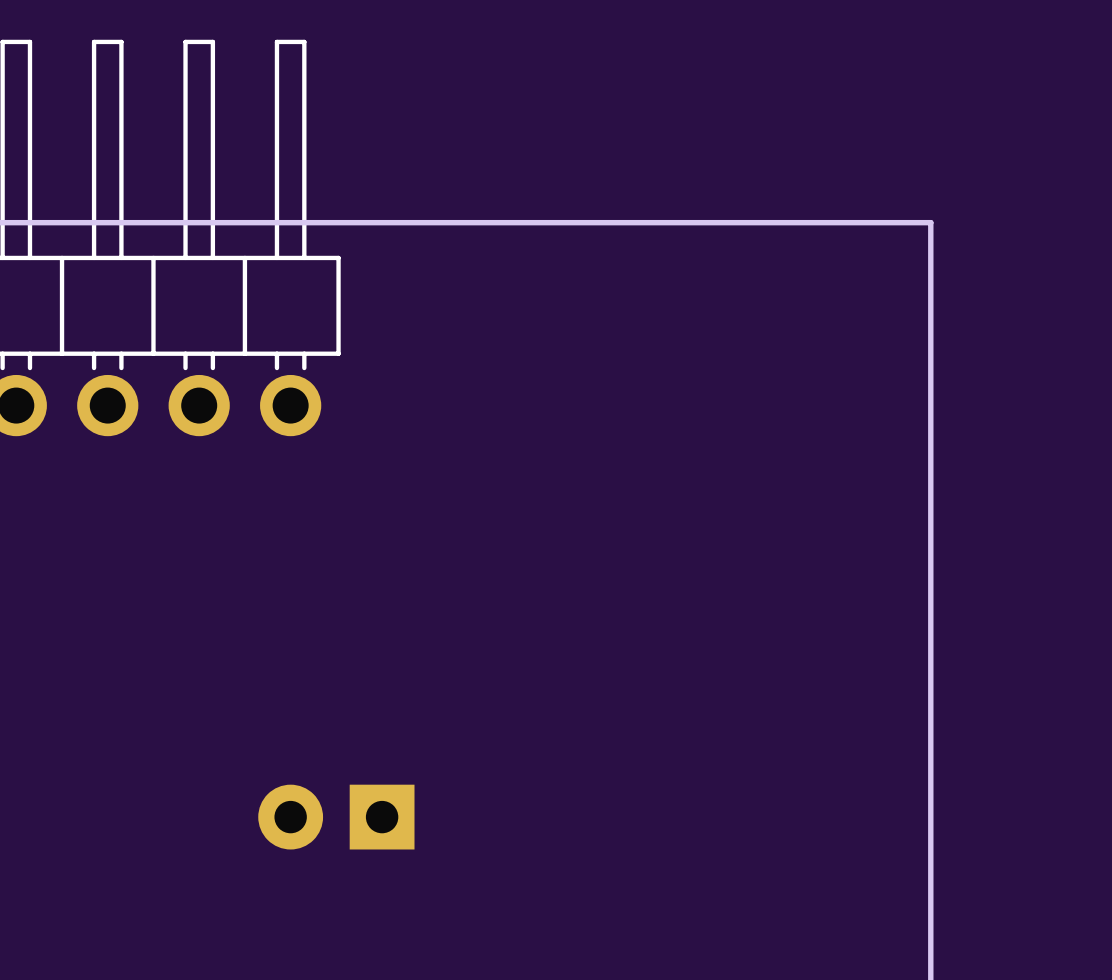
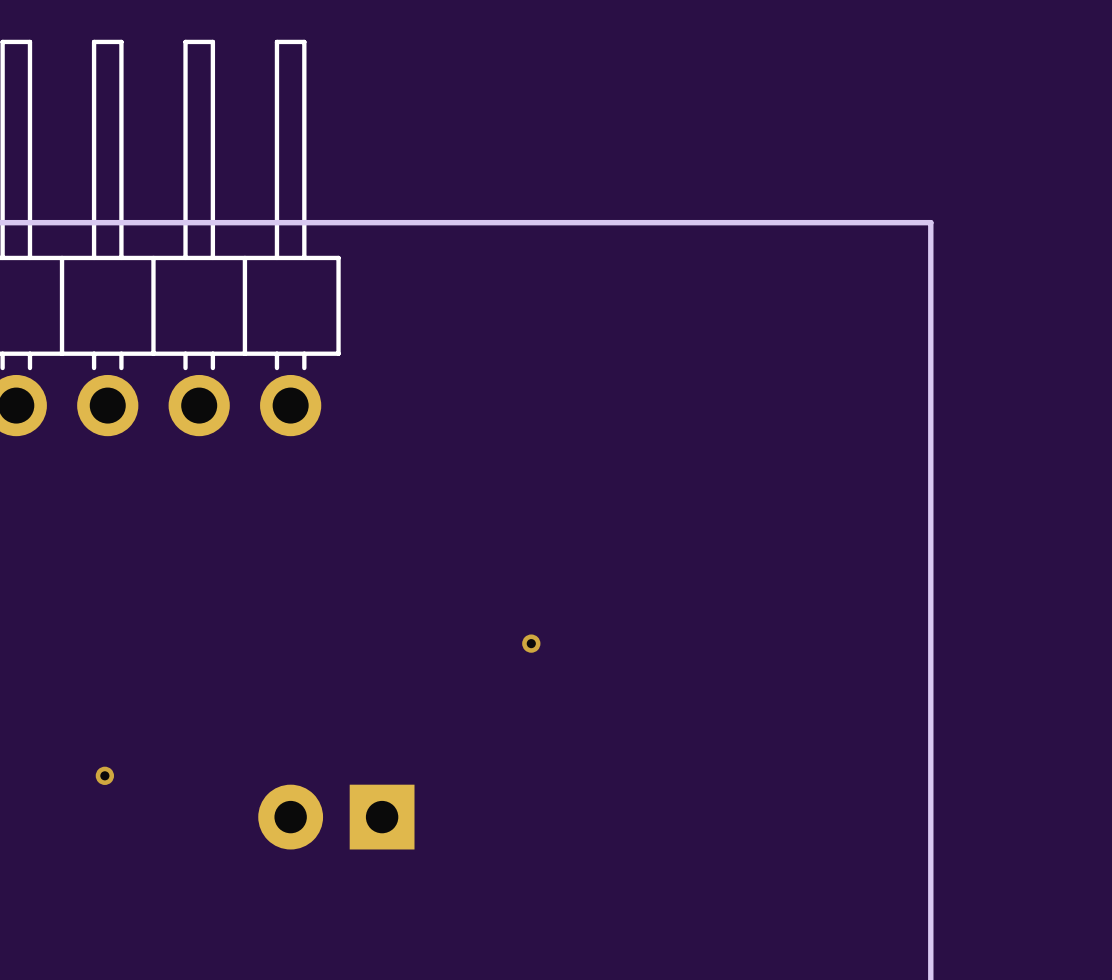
via: none -> (531, 643)
via: none -> (104, 775)

